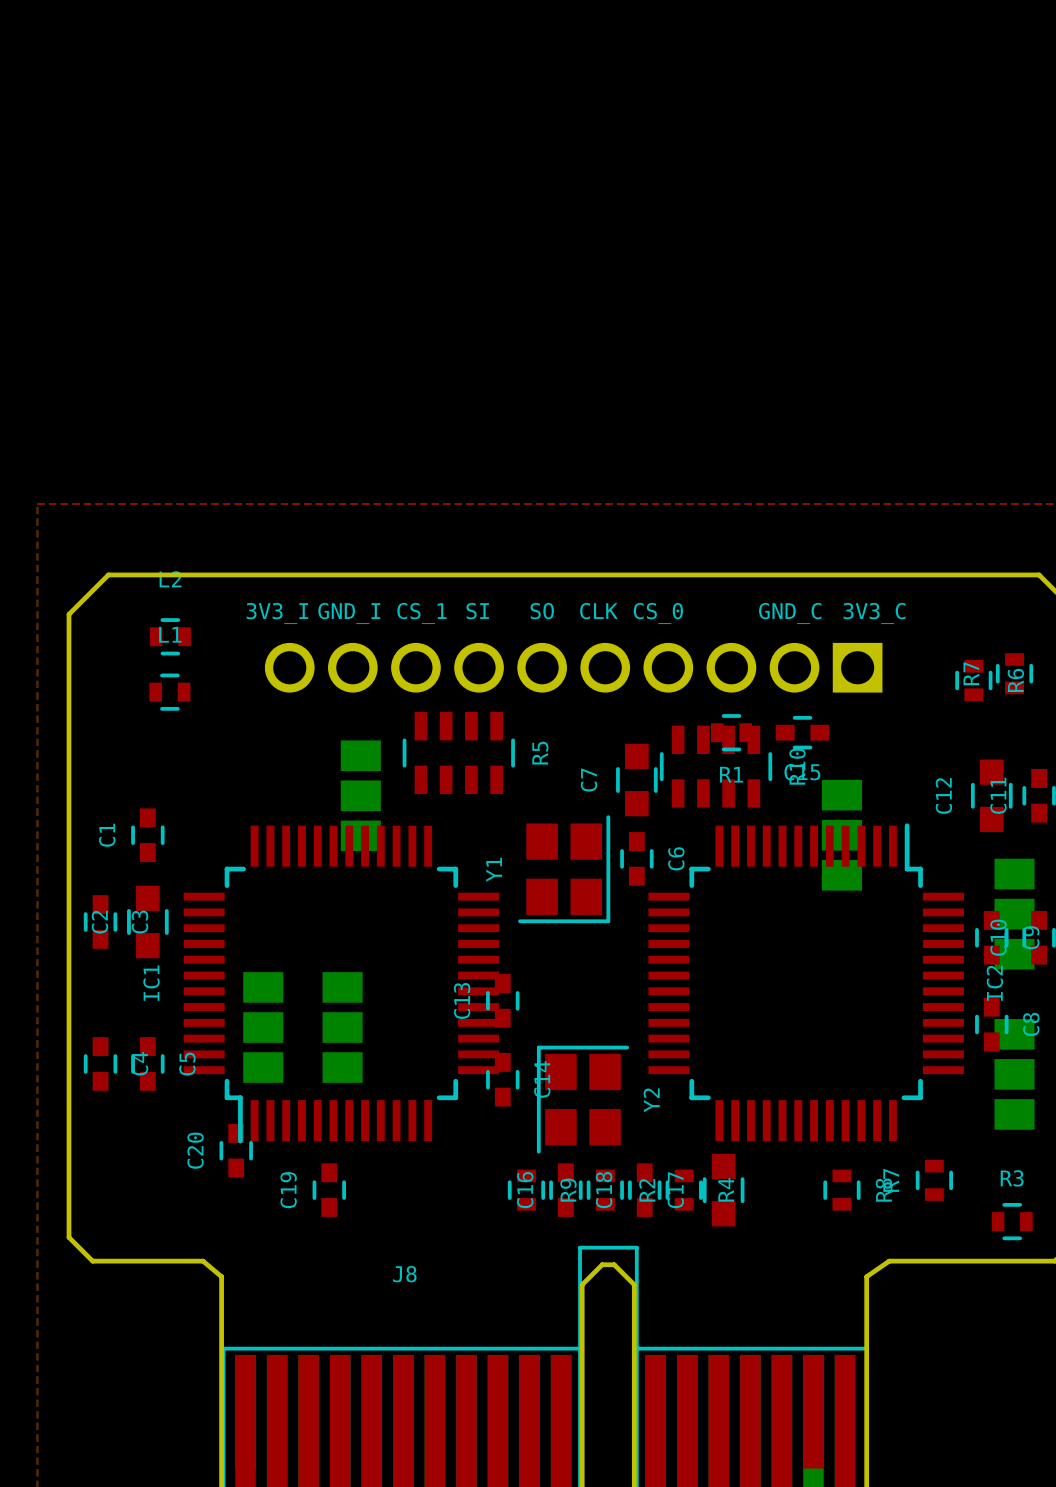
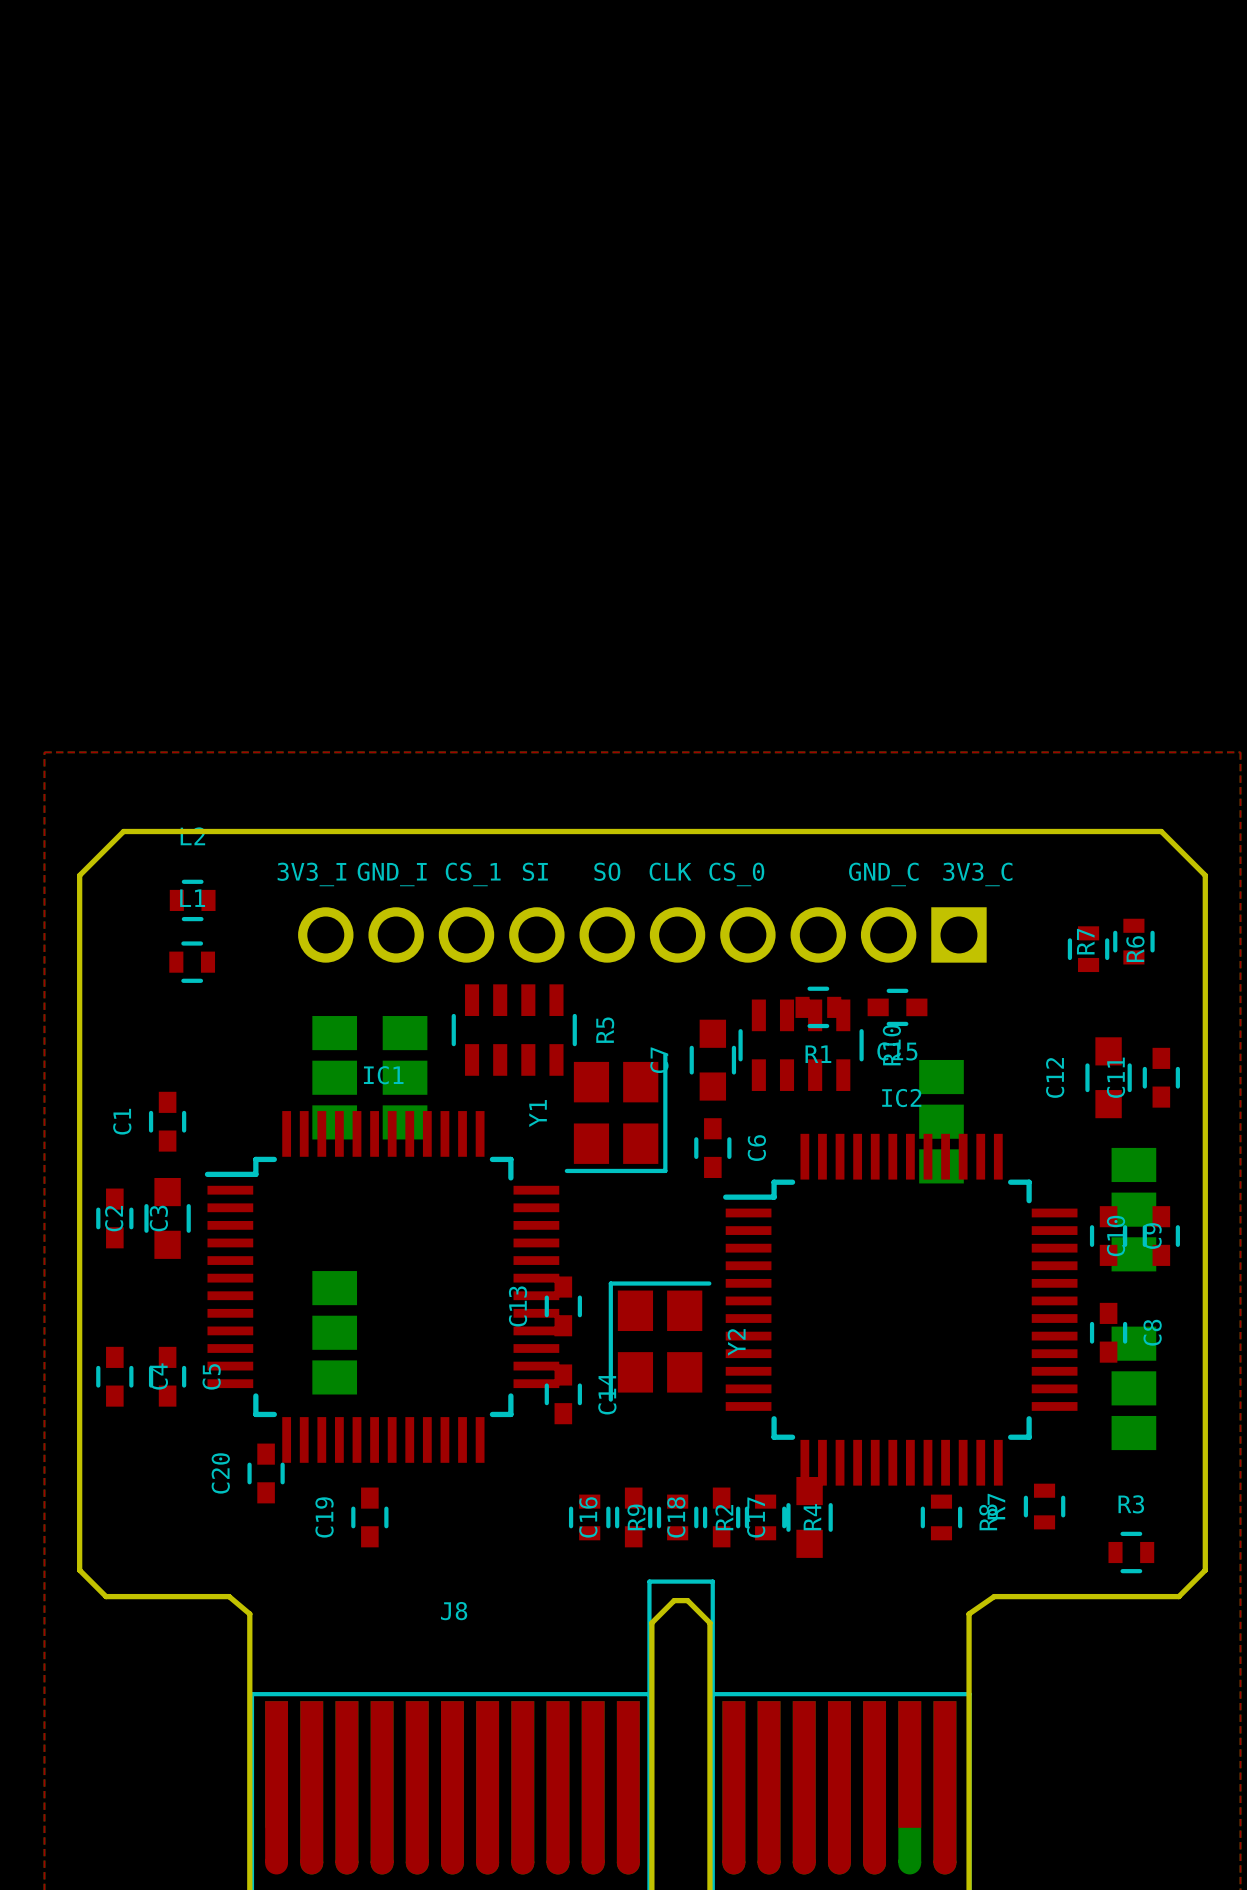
part: none -> (334, 1077)
Y1 position: (564, 869) -> (616, 1112)
IC2 rotation: 0° (806, 982) -> 90° counterclockwise (900, 1309)
IC1 rotation: 0° (341, 984) -> 90° clockwise (382, 1286)
part: none -> (334, 1332)
part: (263, 1027) -> none
part: (342, 1027) -> none
Y2 position: (582, 1099) -> (660, 1341)

